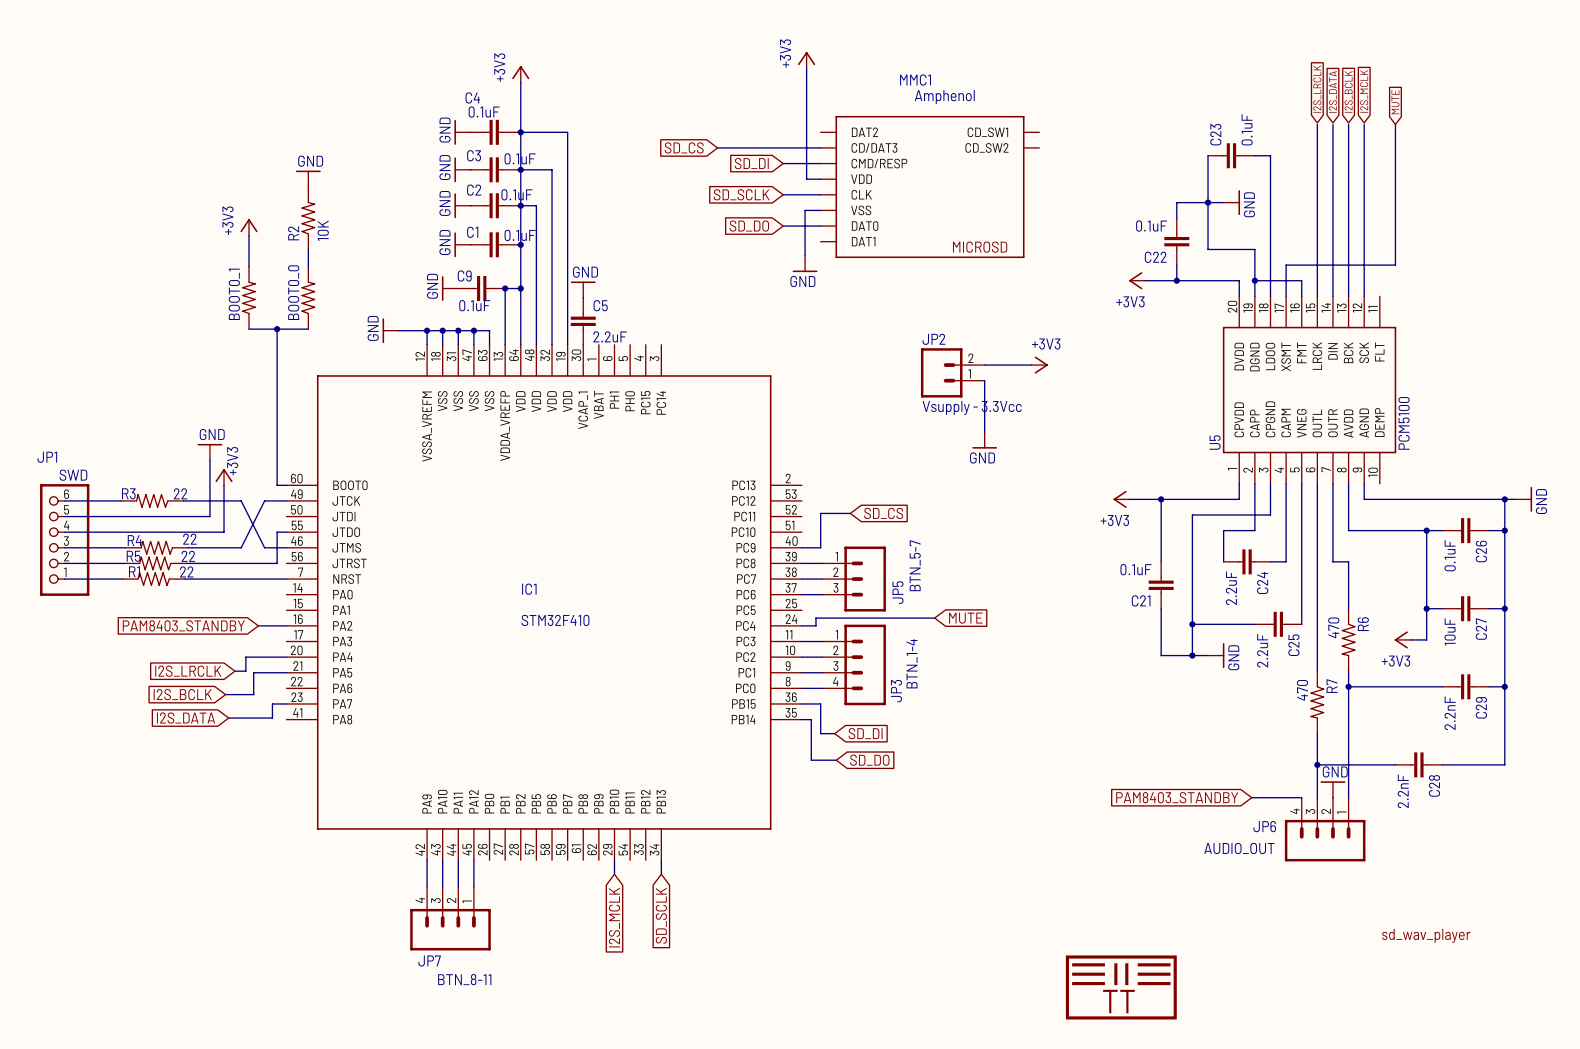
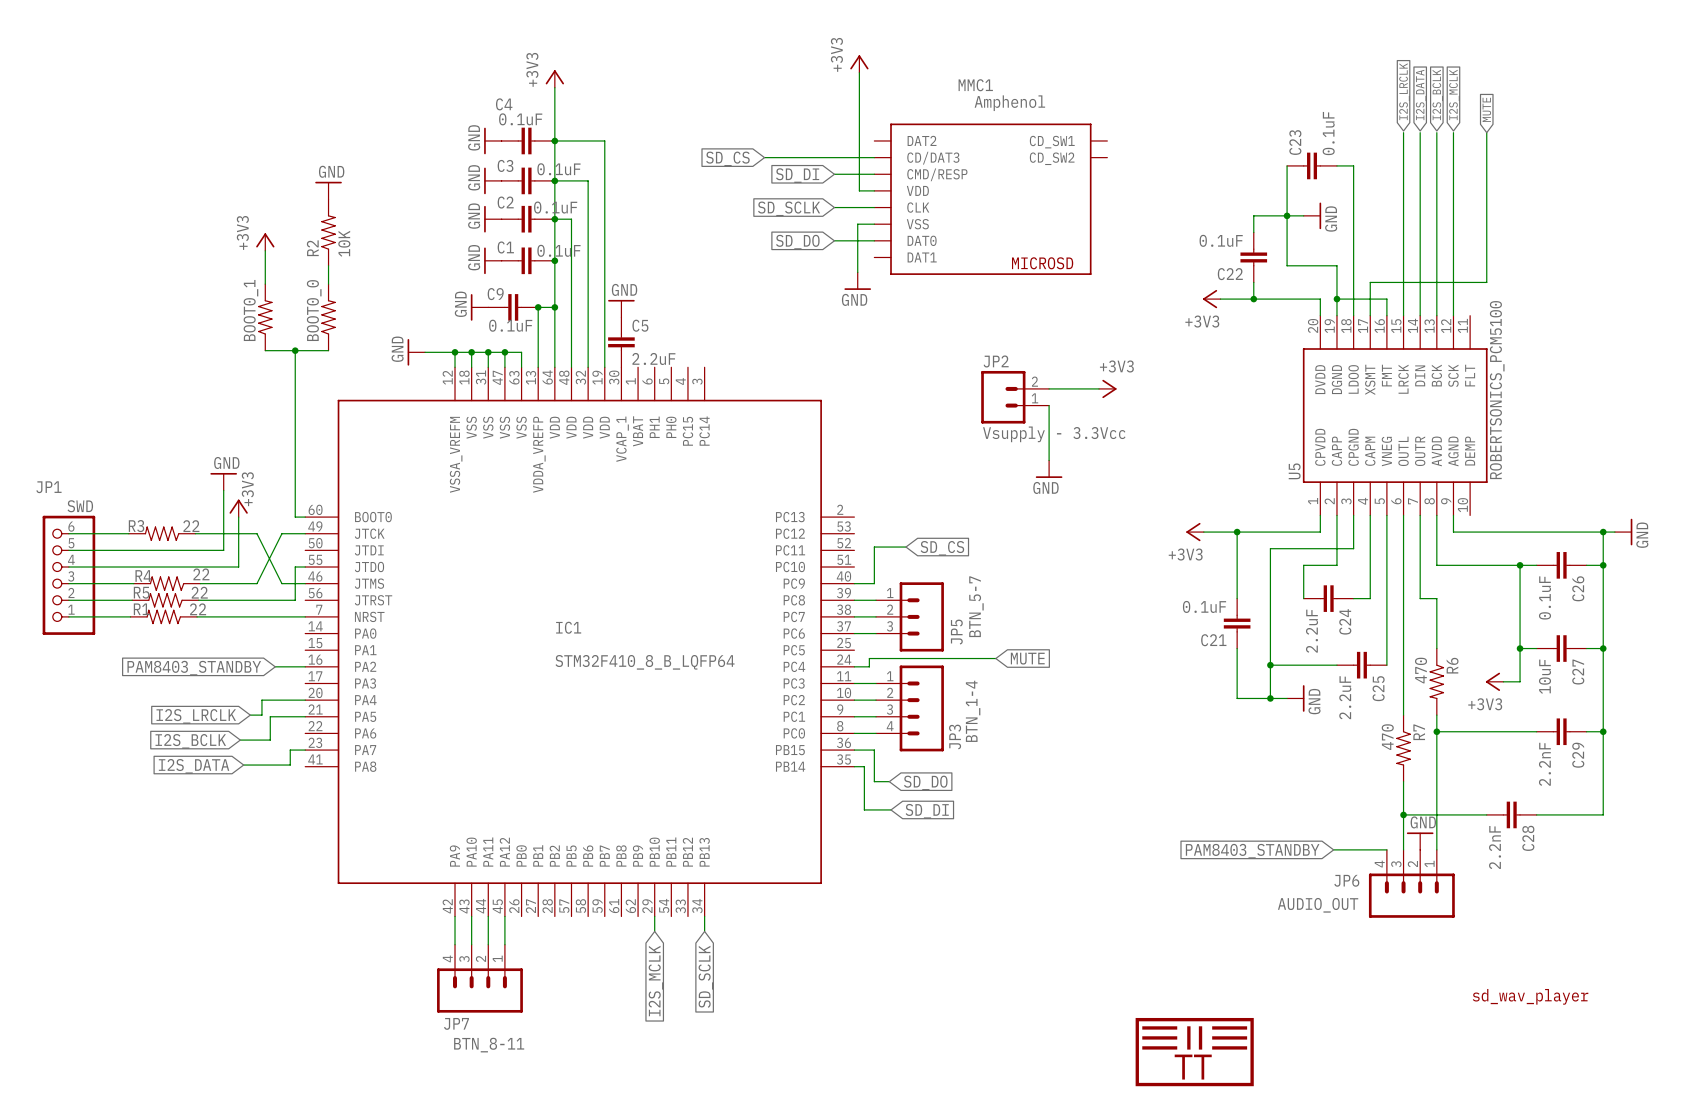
U5 value: PCM5100 (1404, 423) -> ROBERTSONICS_PCM5100 (1497, 390)
IC1 value: STM32F410 (555, 620) -> STM32F410_8_B_LQFP64 (645, 662)
global label: SD_DI (865, 733) -> SD_DO (925, 782)
global label: SD_DO (869, 760) -> SD_DI (927, 811)

